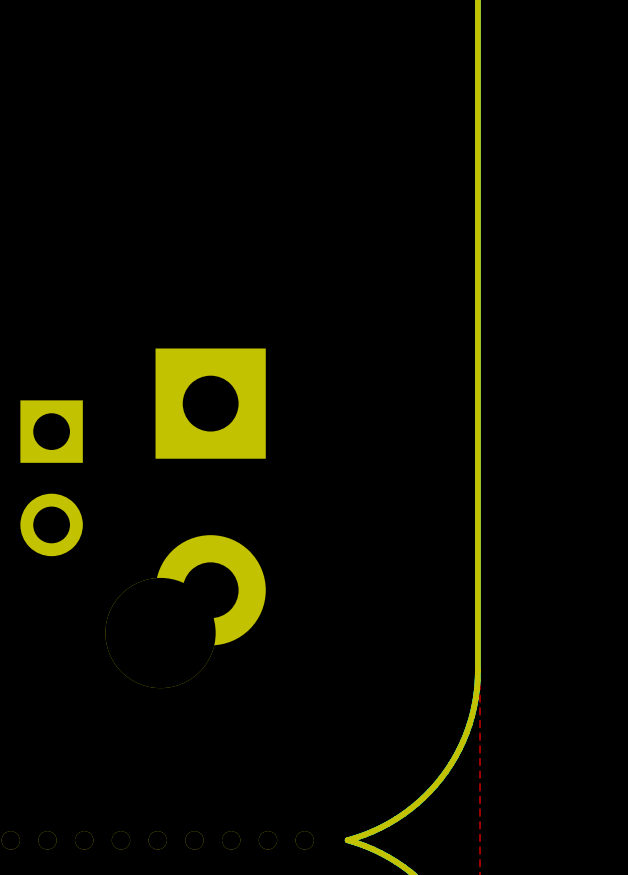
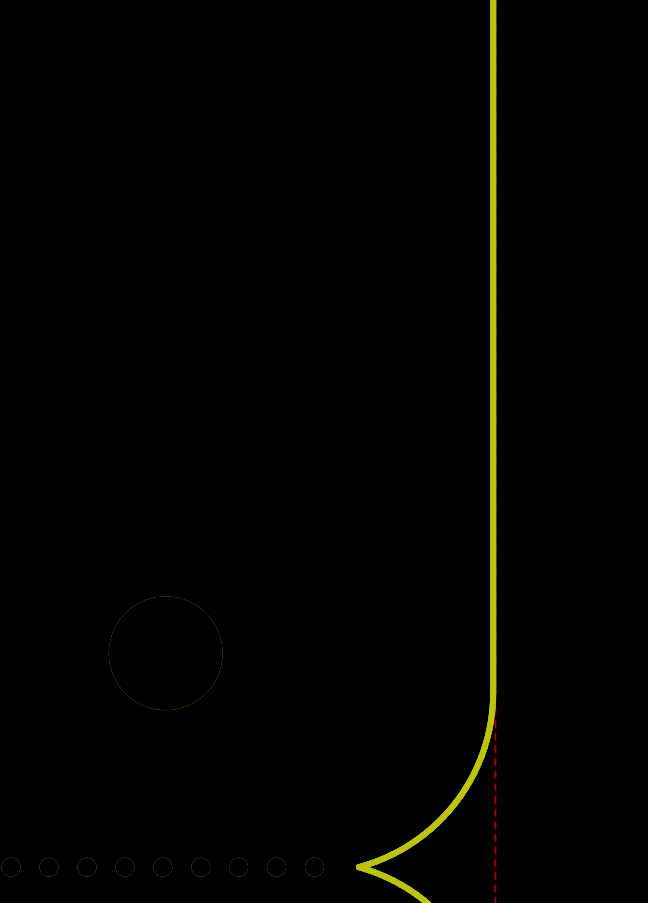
part: (51, 478) -> none
part: (210, 496) -> none

